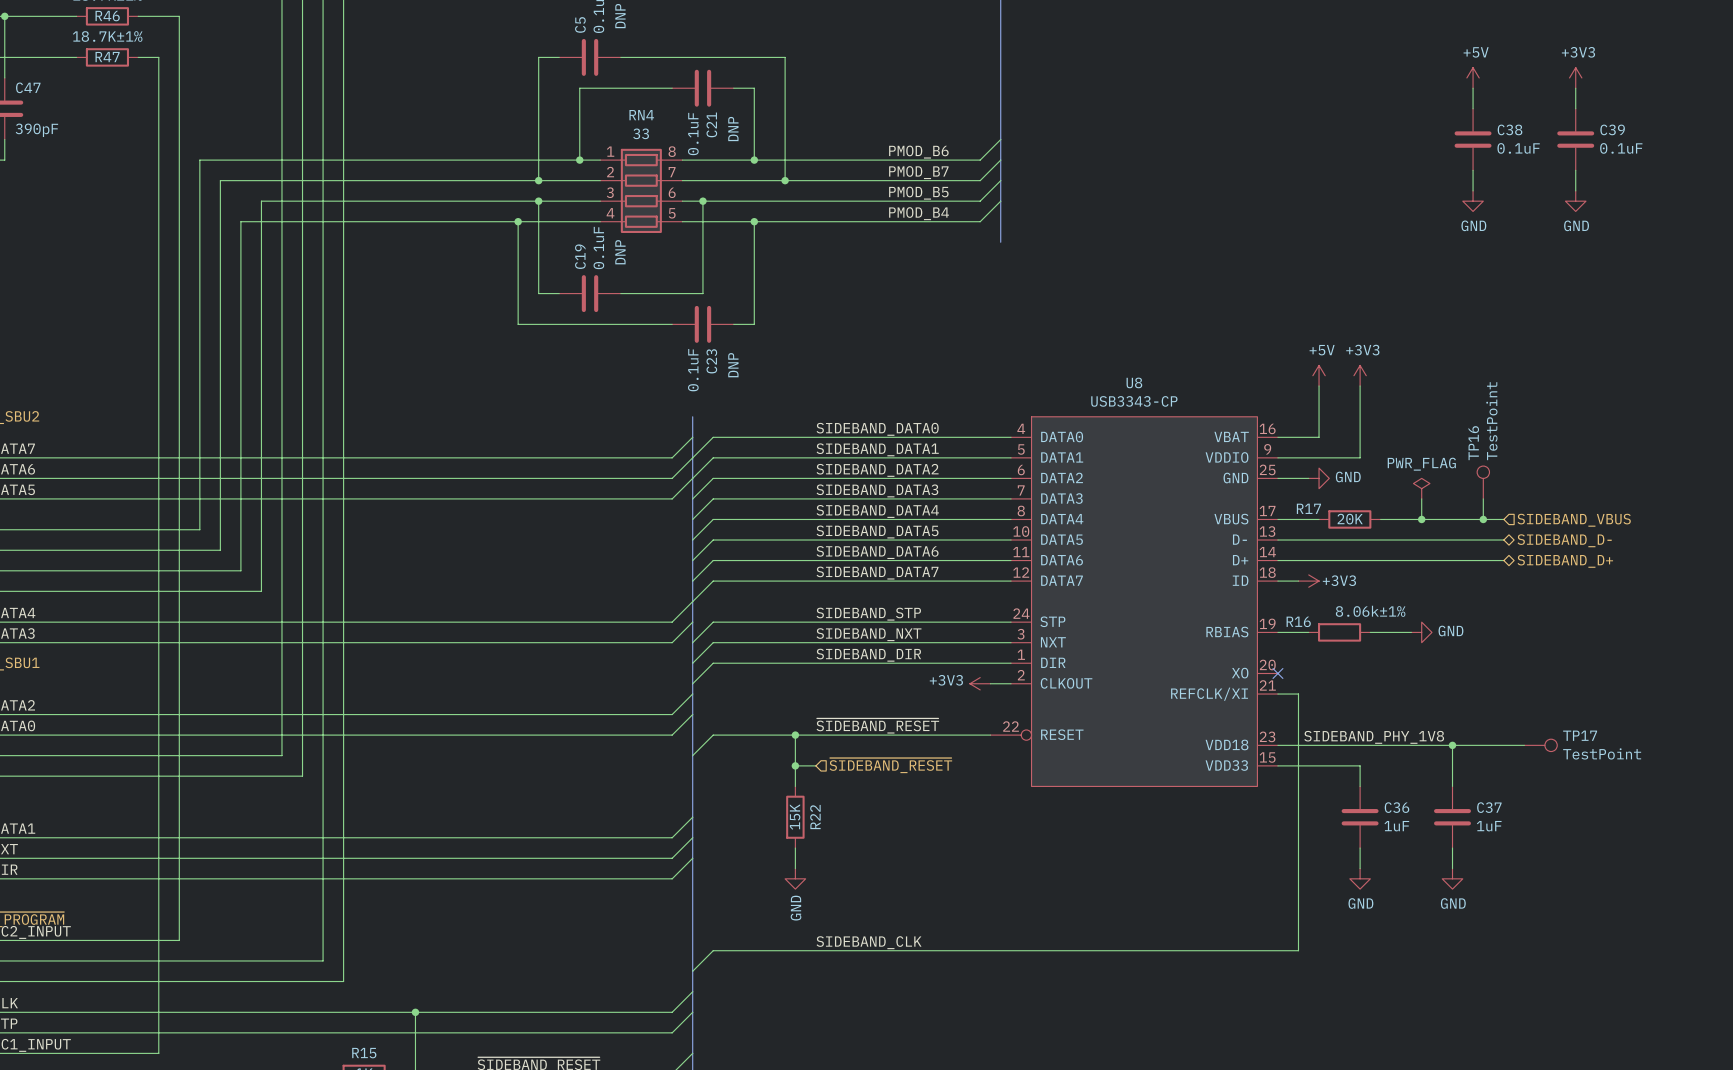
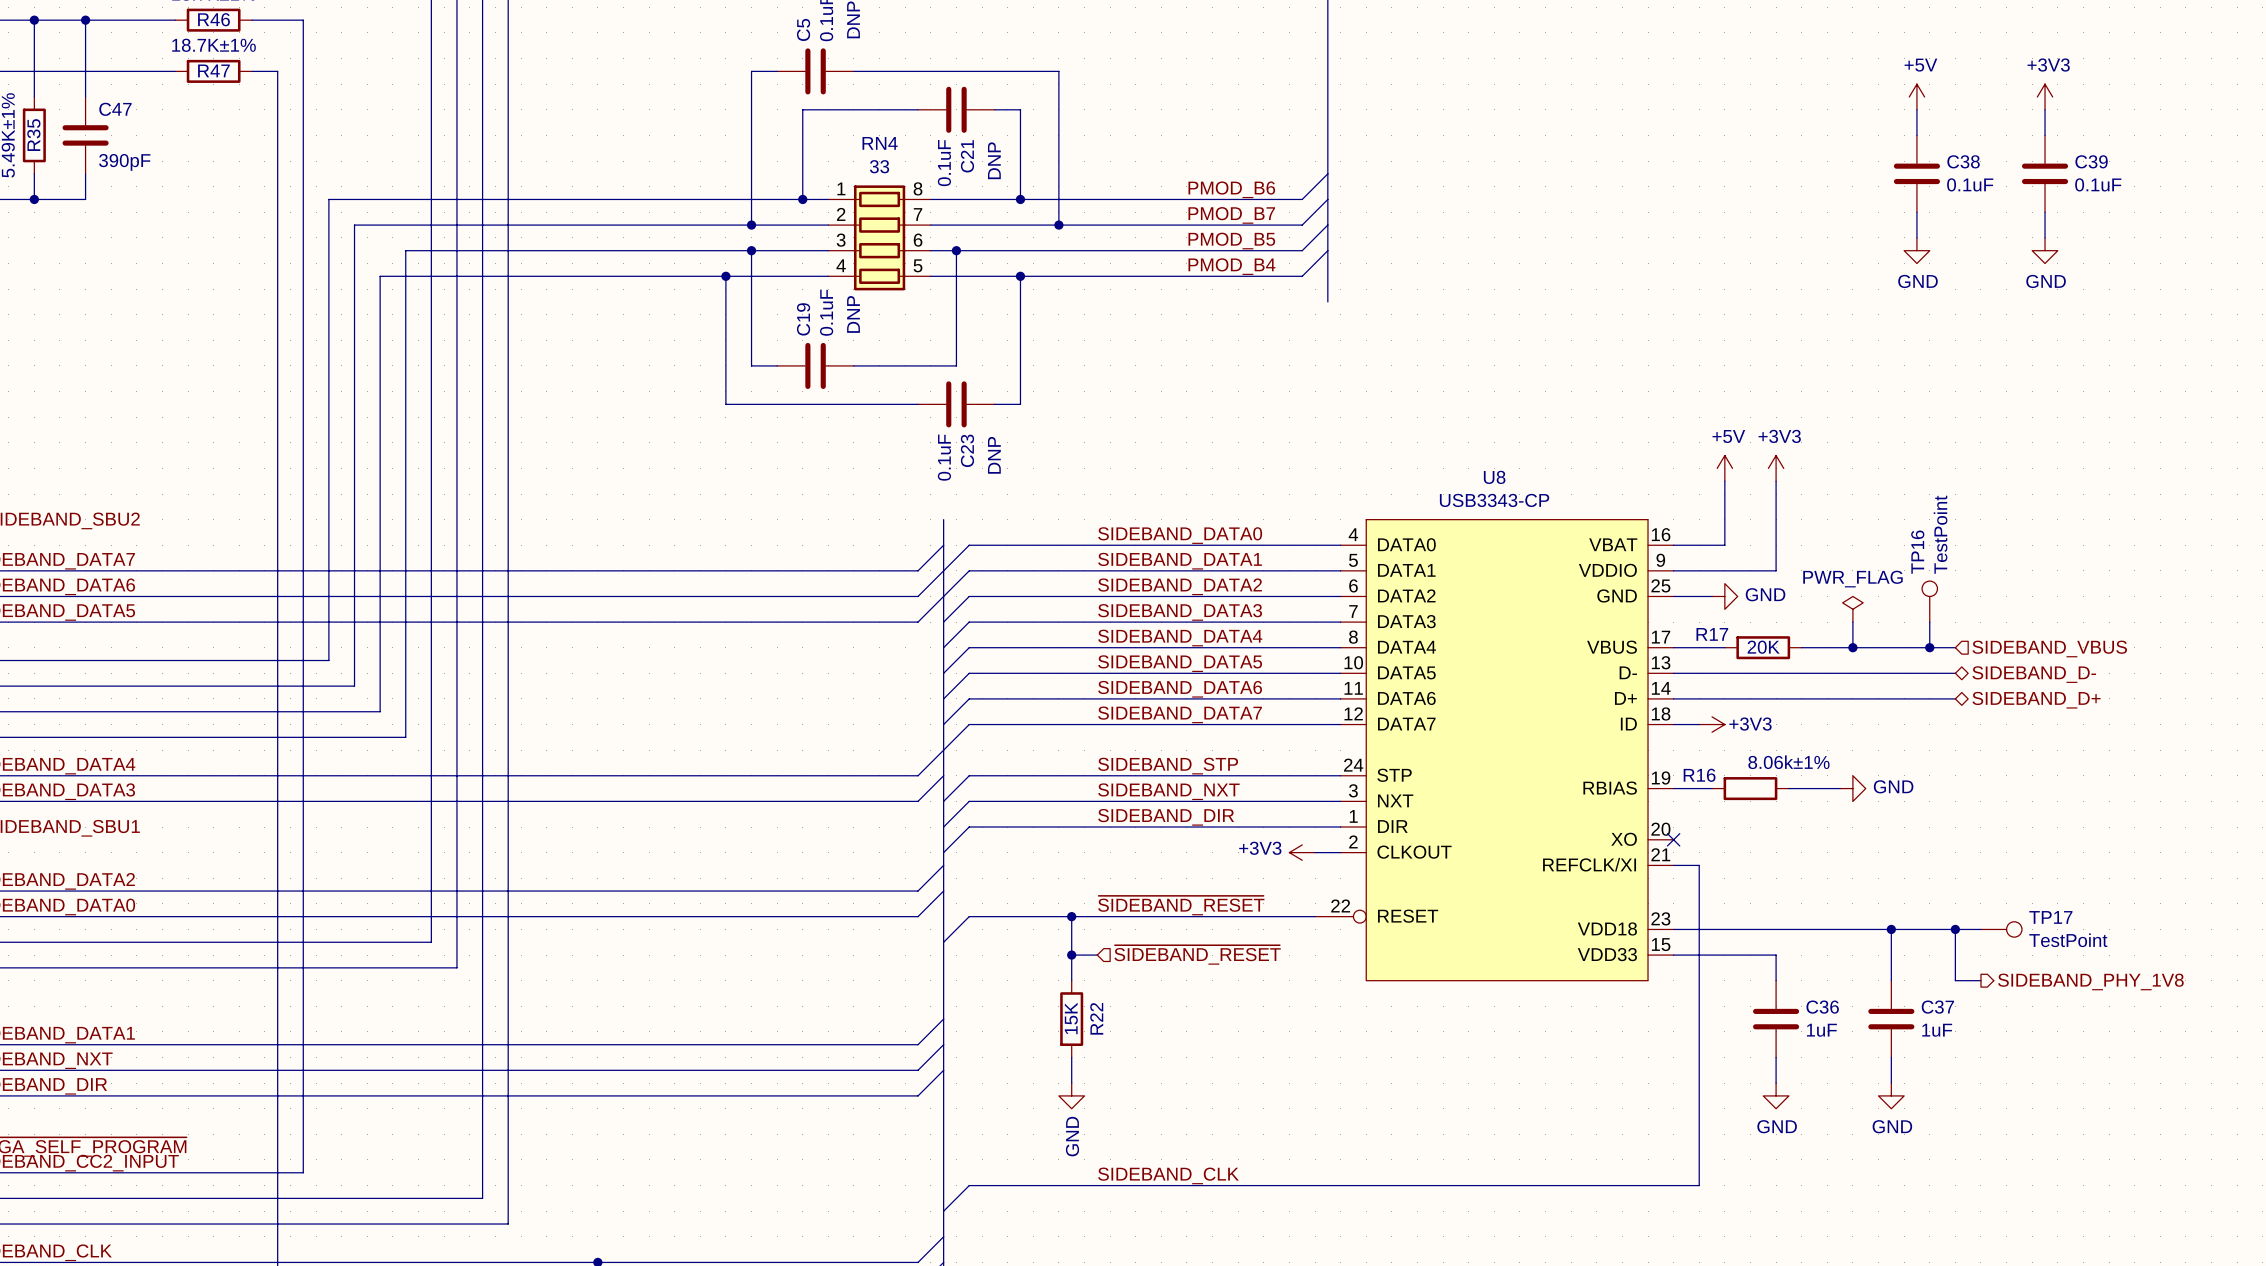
label: SIDEBAND_PHY_1V8 (1374, 737) -> none
wire: none -> (1955, 929) (1955, 980) (1980, 980)
junction: none -> (1955, 929)
hierarchical label: none -> SIDEBAND_PHY_1V8 (2090, 981)

